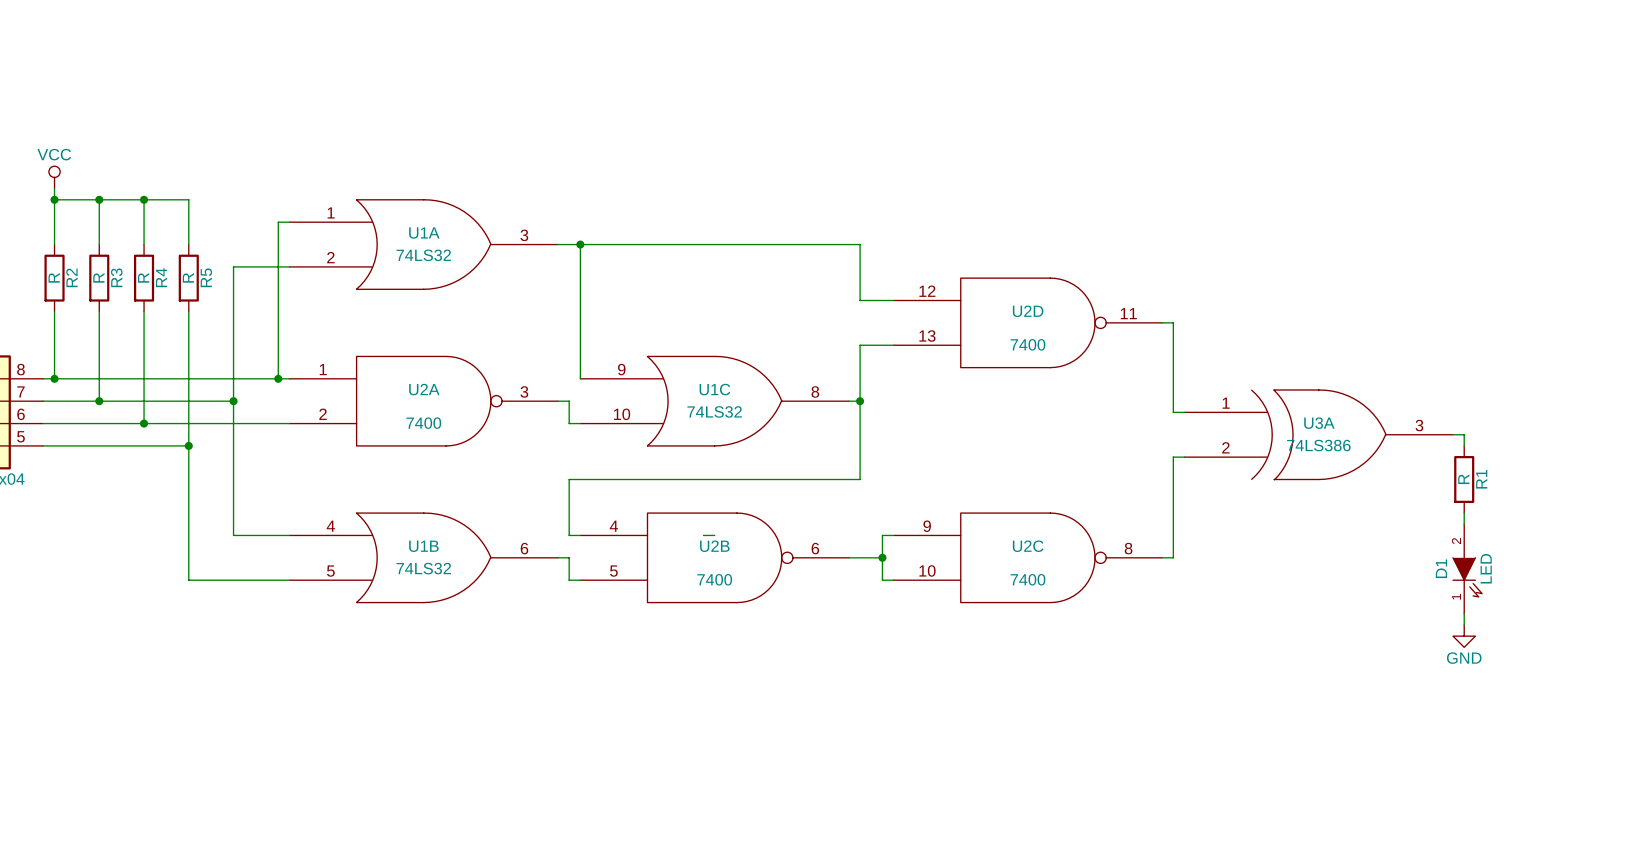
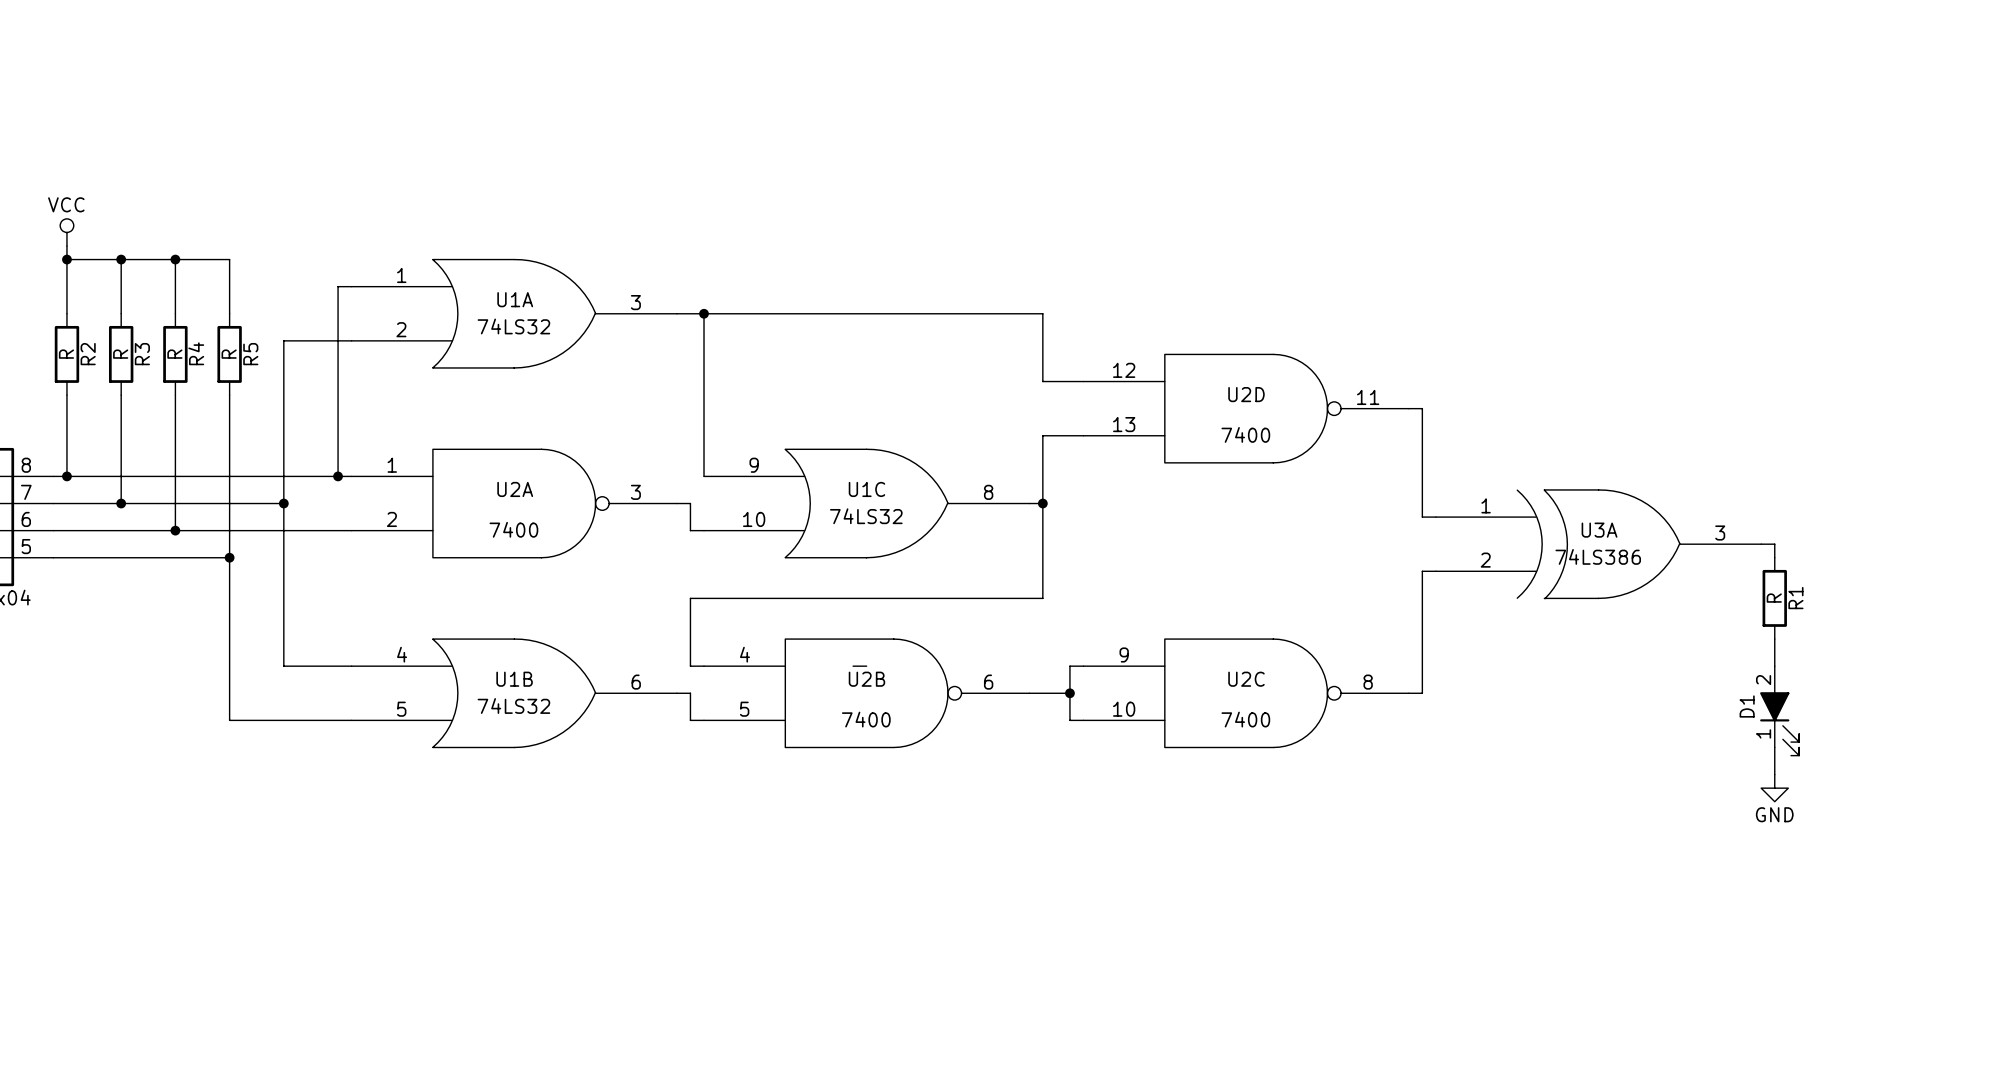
D1 symbol: [1453, 524, 1483, 614] -> [1760, 666, 1800, 756]
D1 value: LED (1486, 568) -> none

